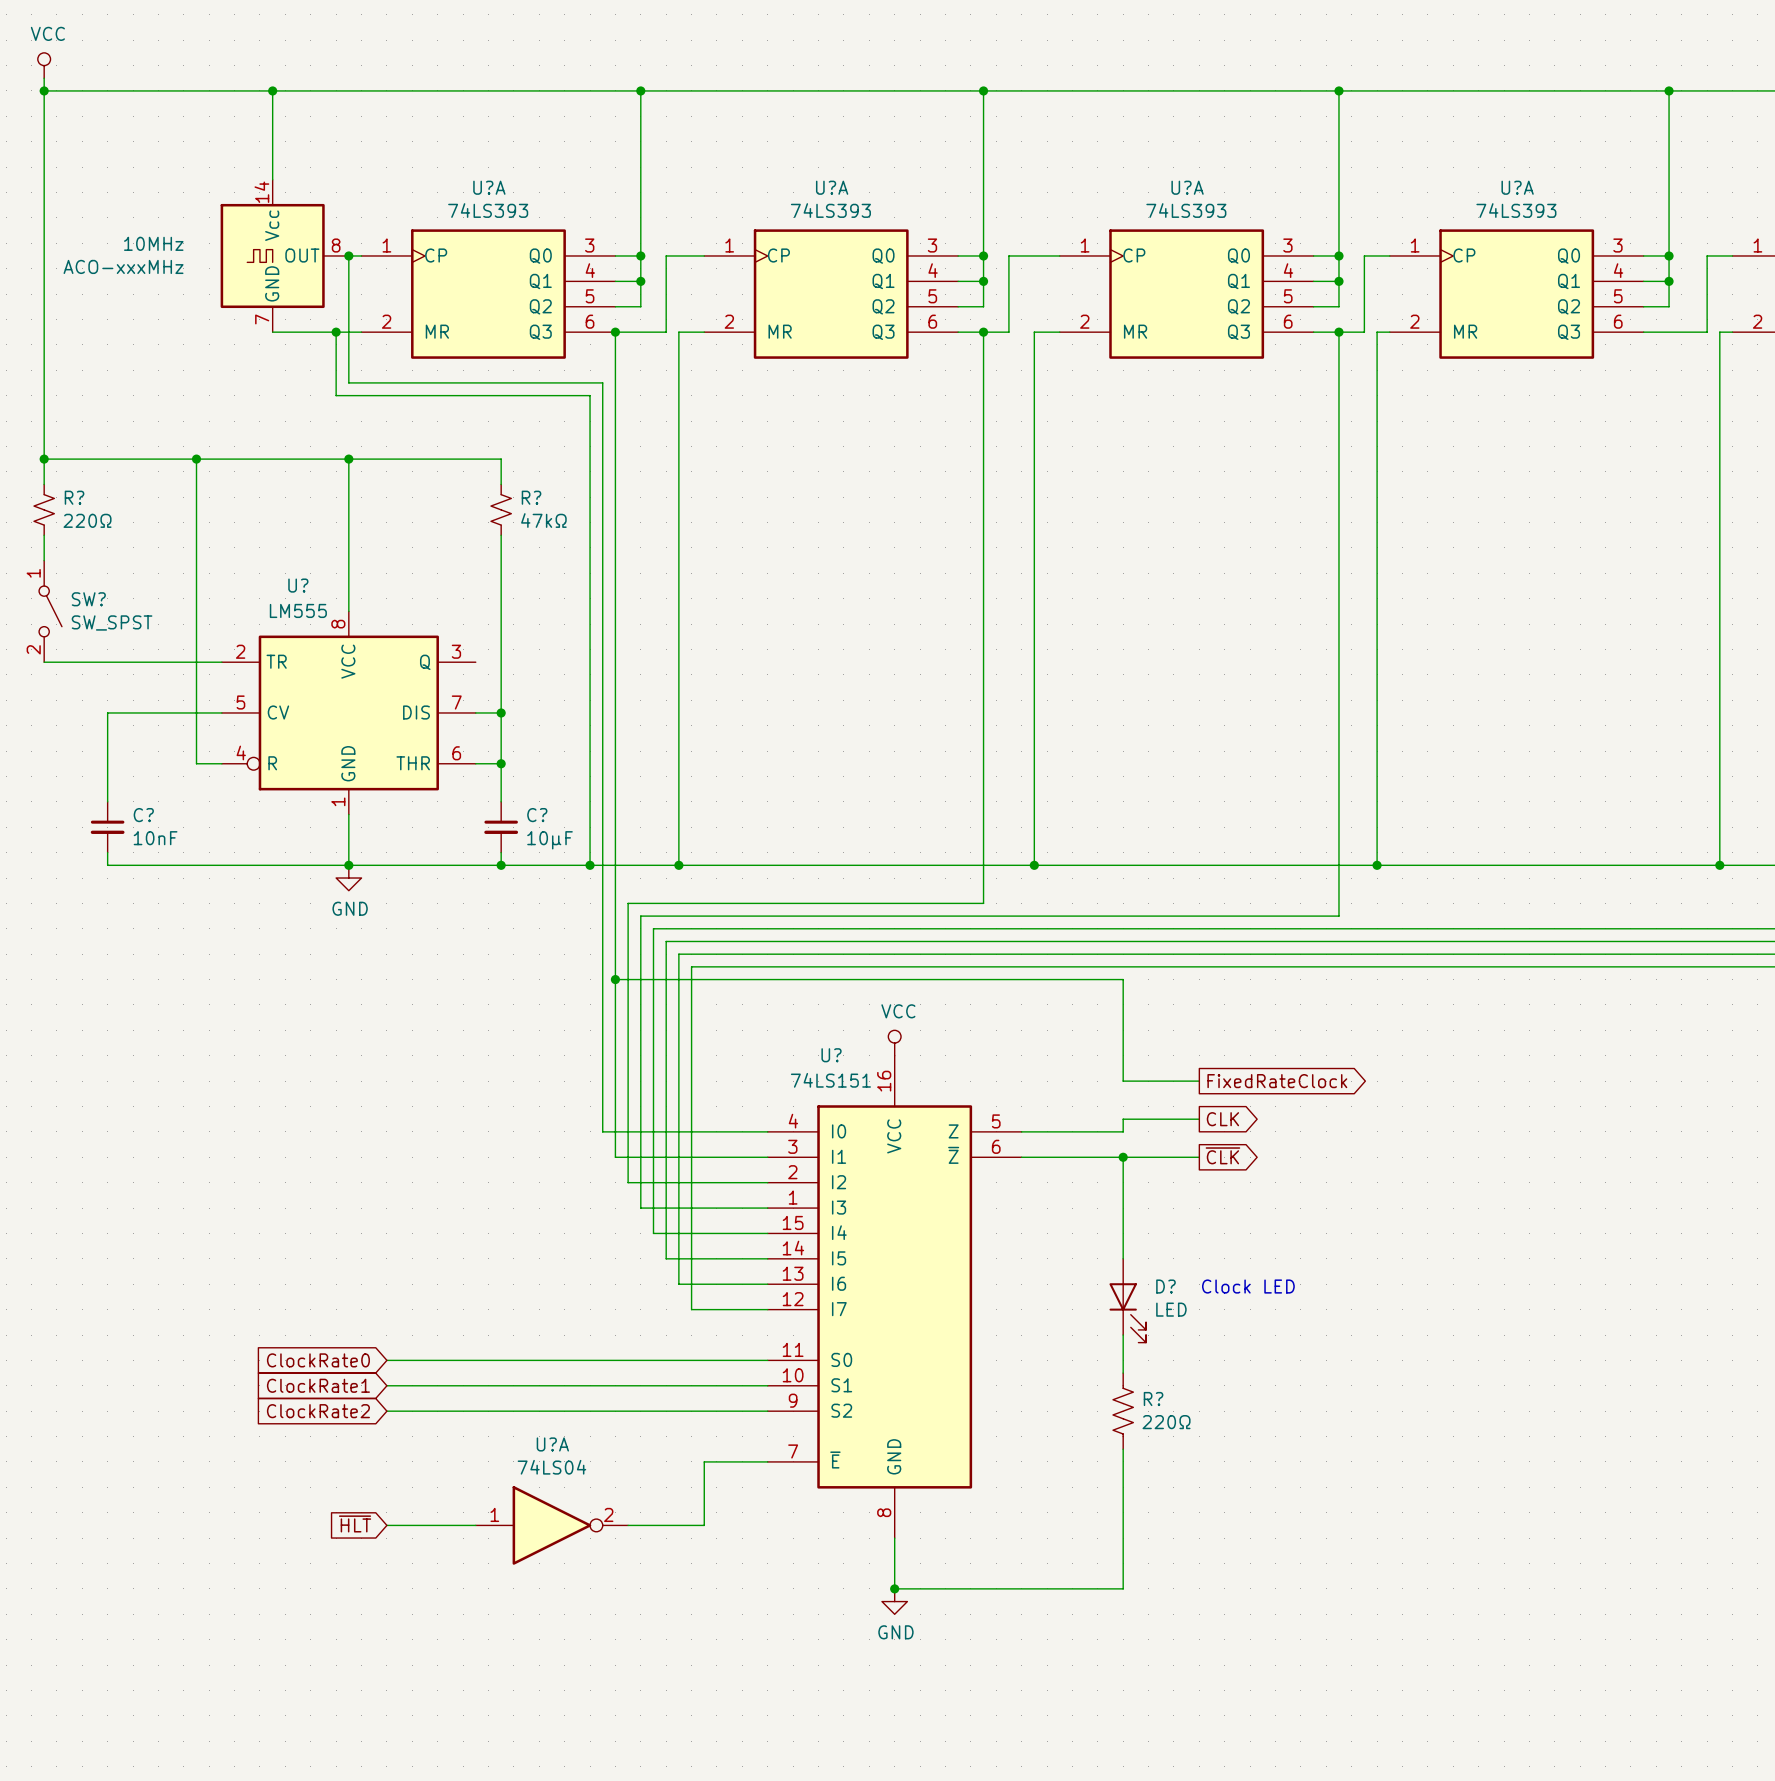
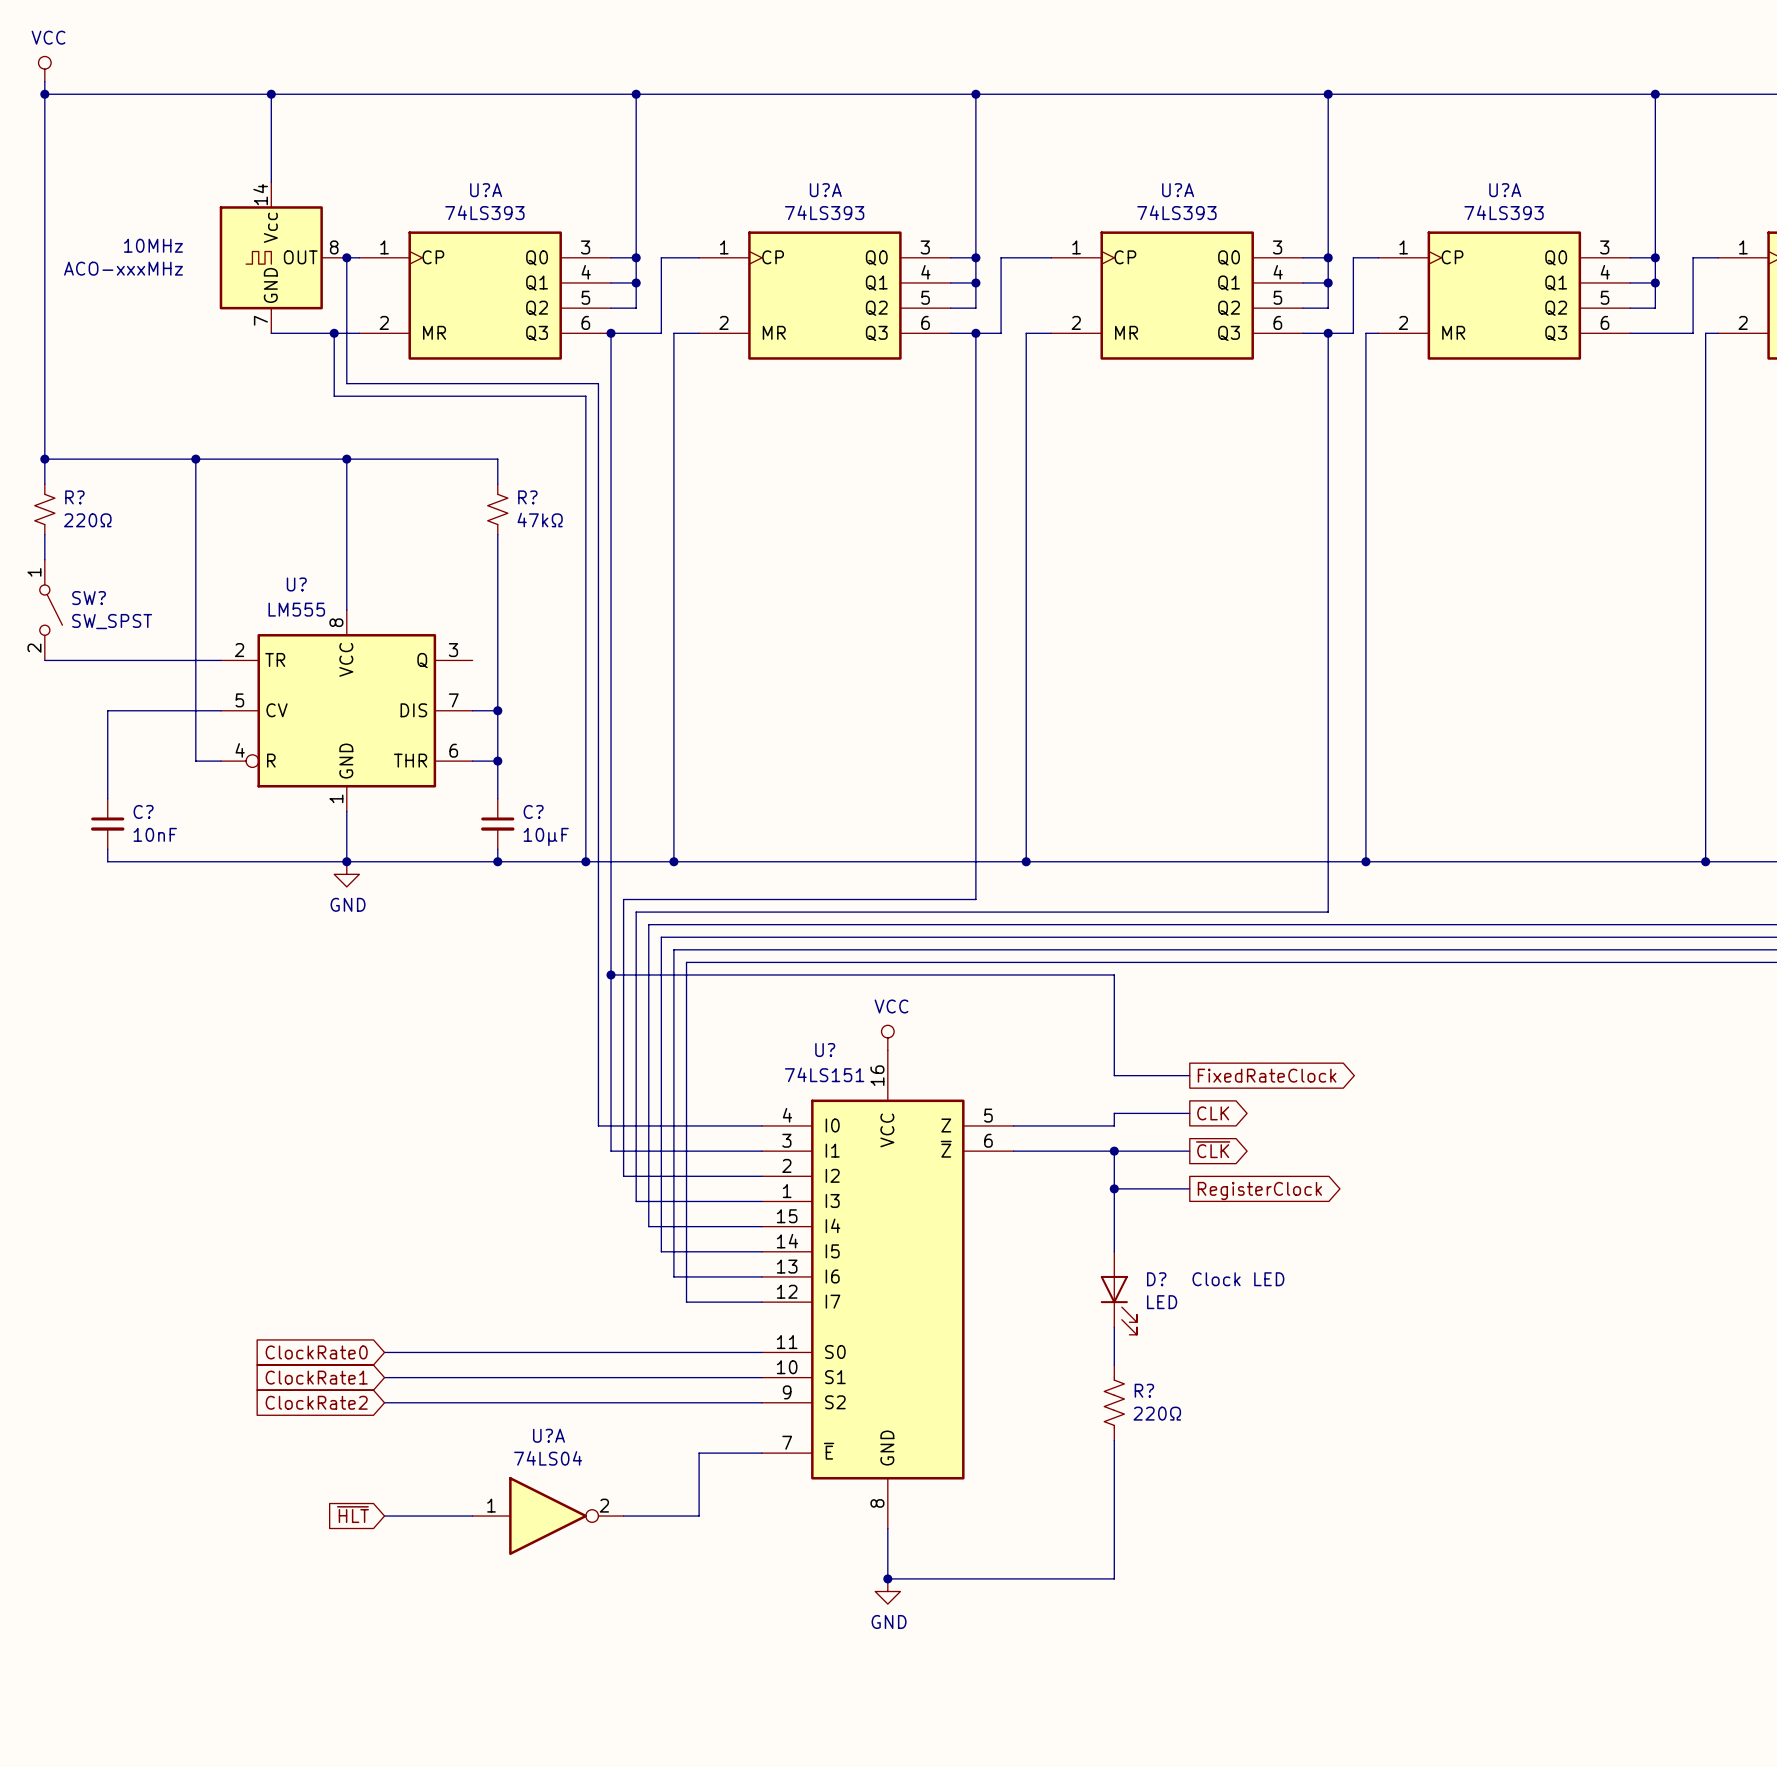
wire: none -> (1114, 1188) (1189, 1188)
junction: none -> (1114, 1188)
global label: none -> RegisterClock (1259, 1190)

